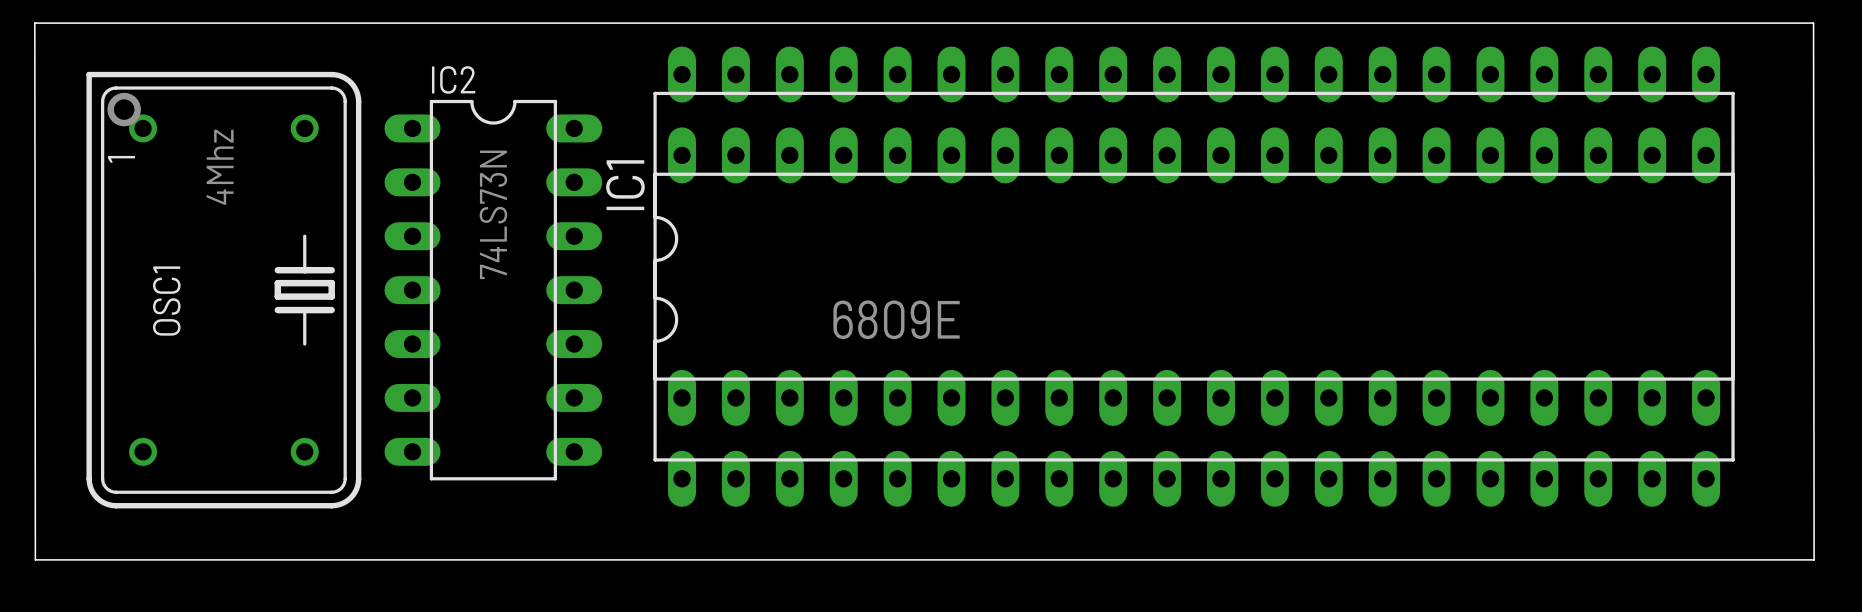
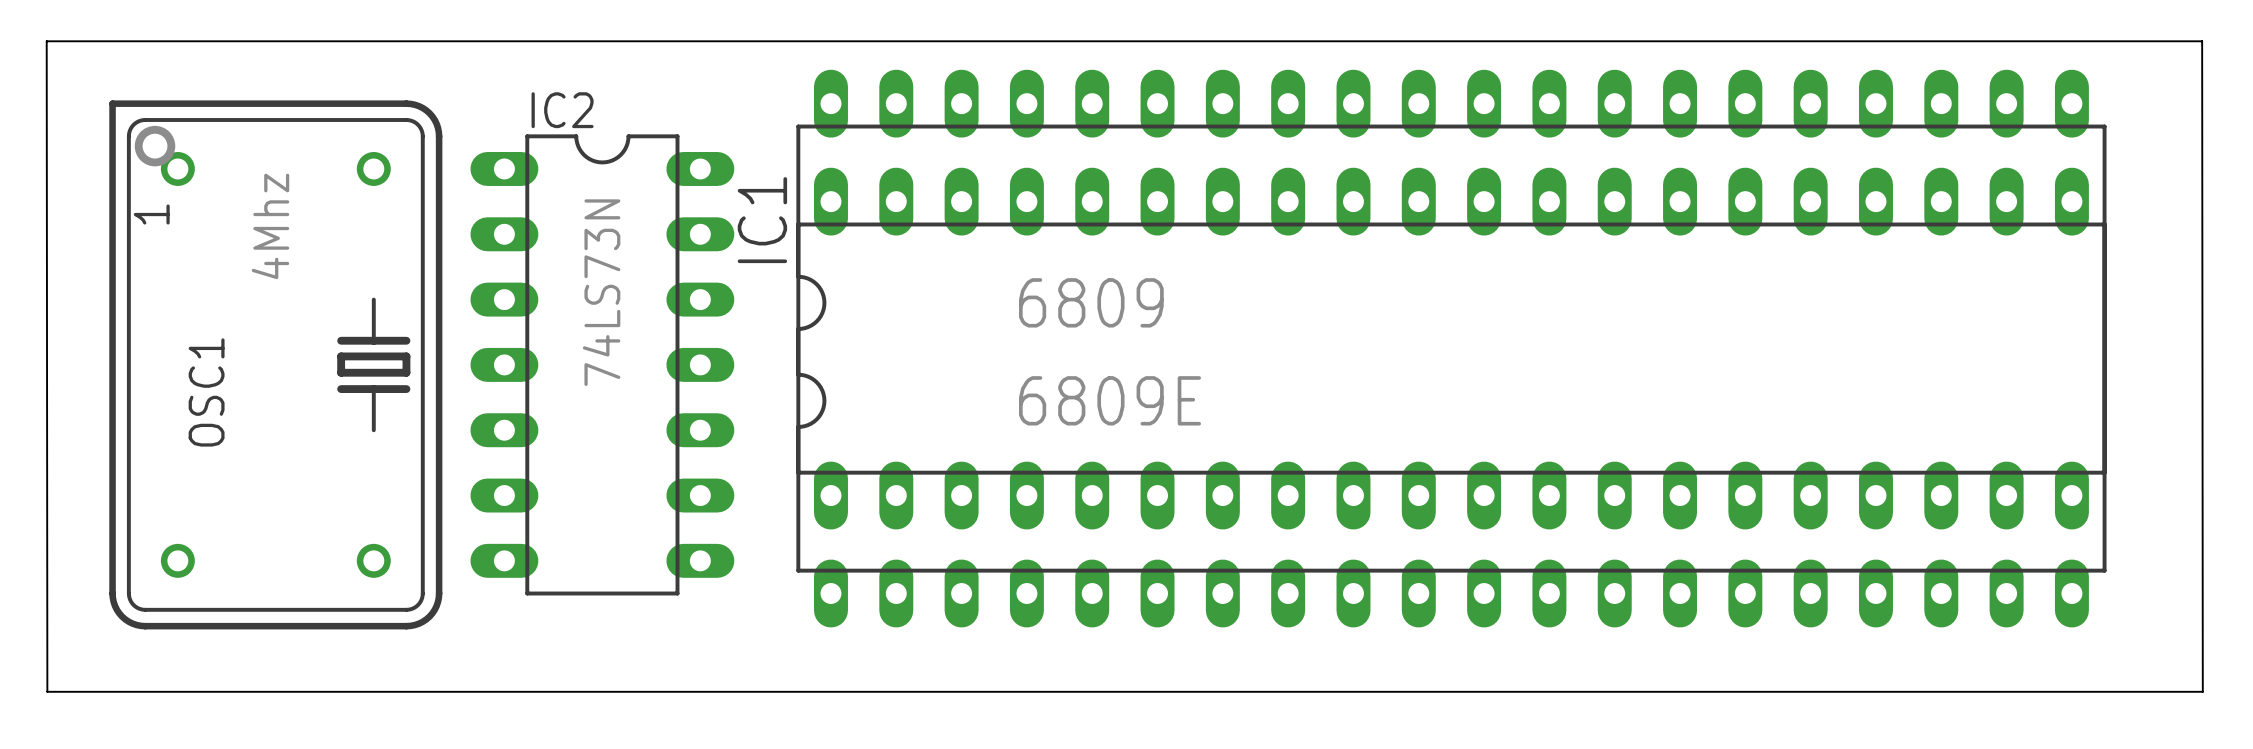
part value: none -> 6809 (1091, 302)

